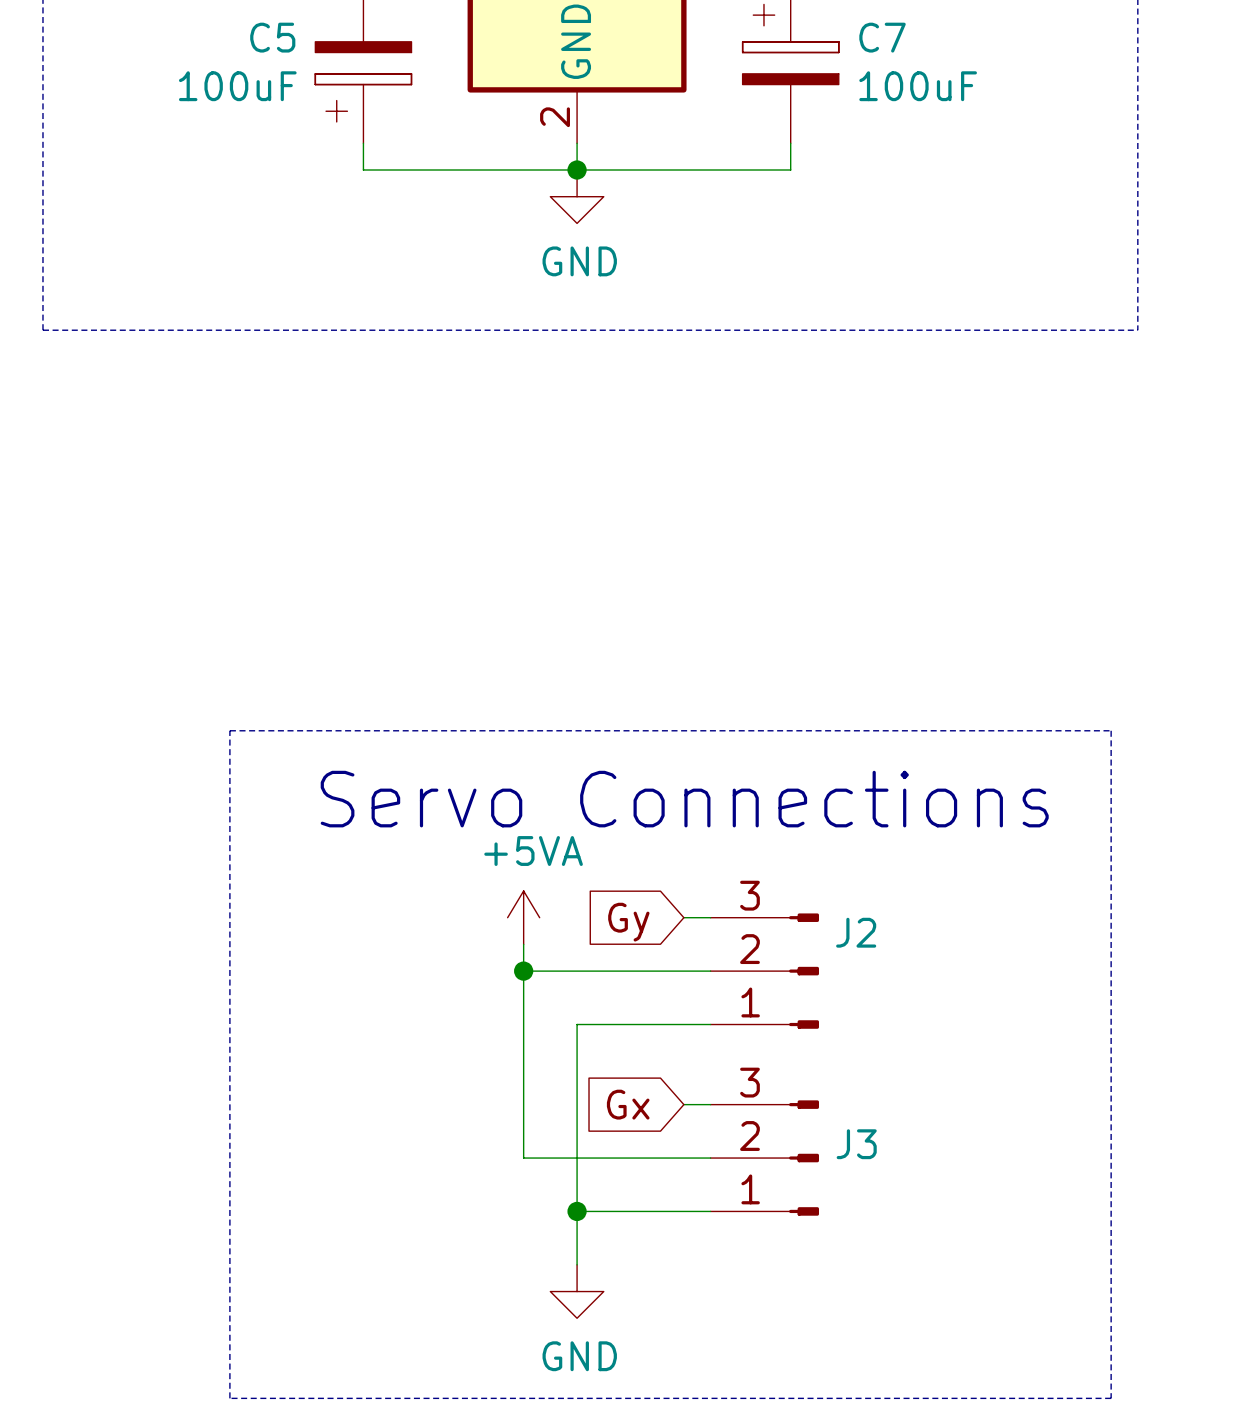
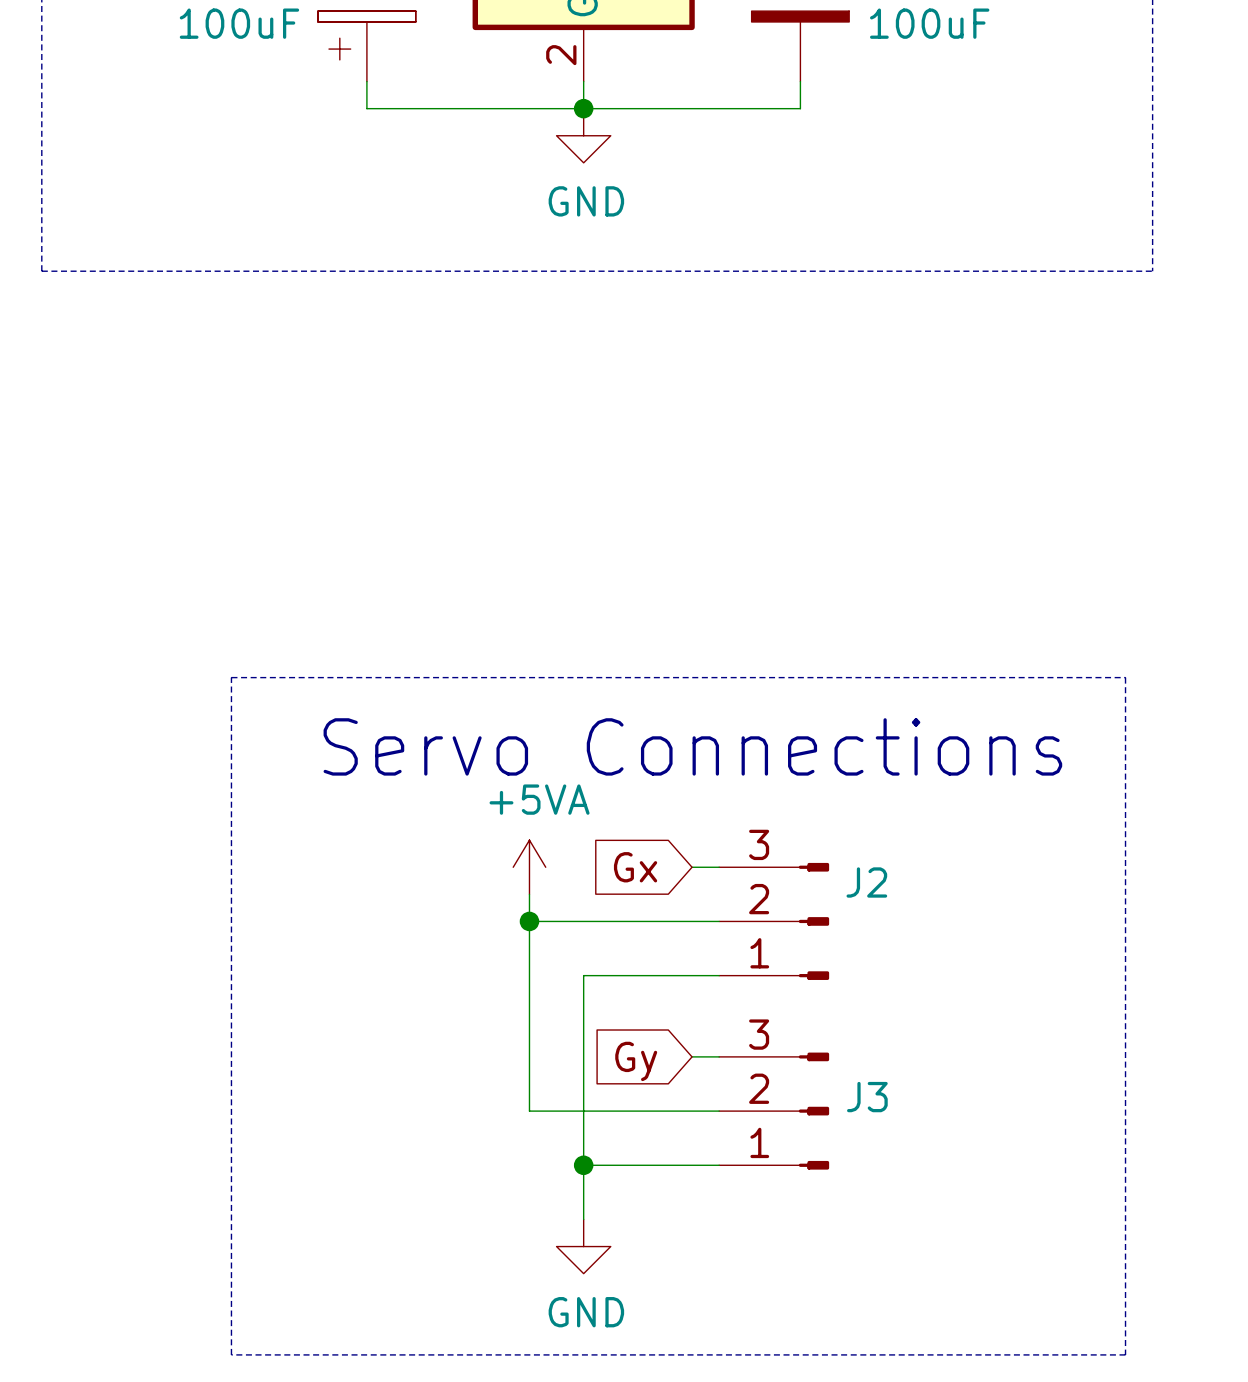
global label: Gy (628, 922) -> Gx (635, 867)
global label: Gx (628, 1104) -> Gy (636, 1061)

